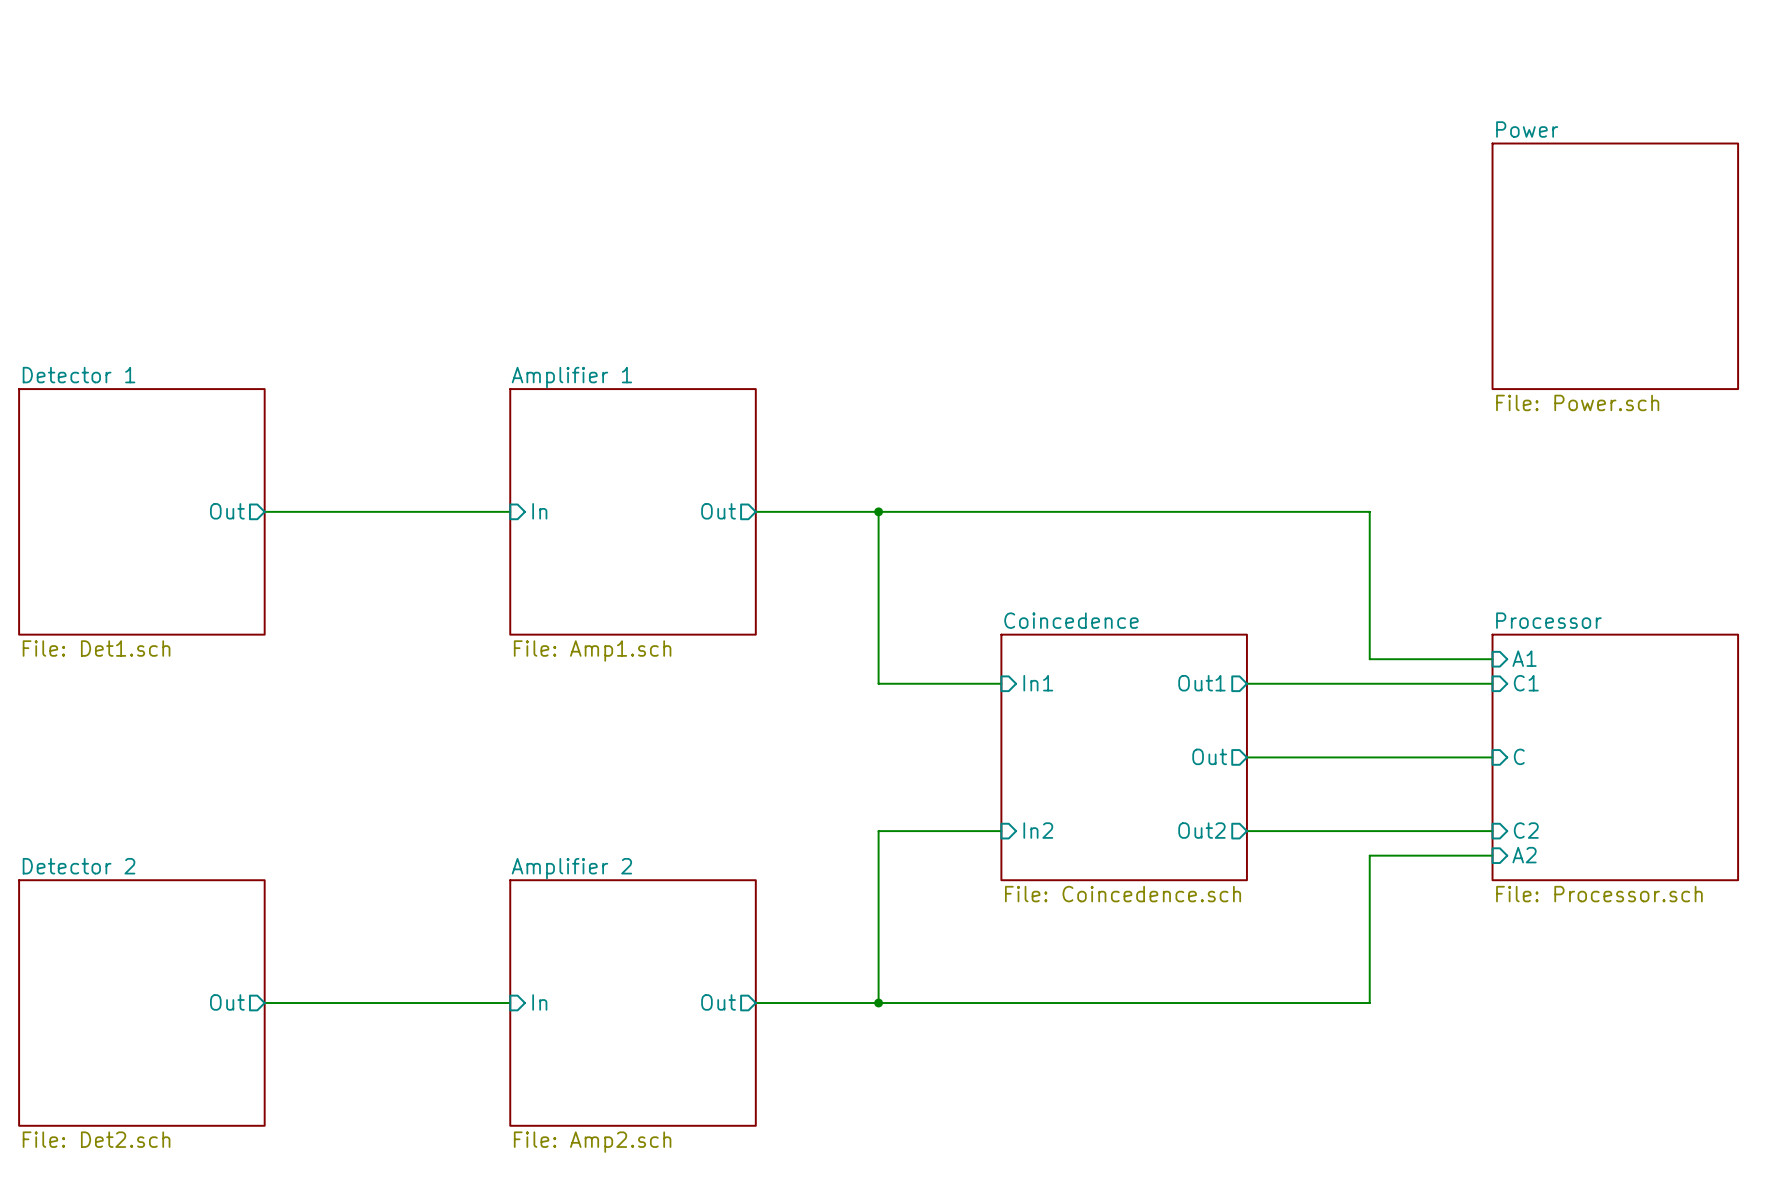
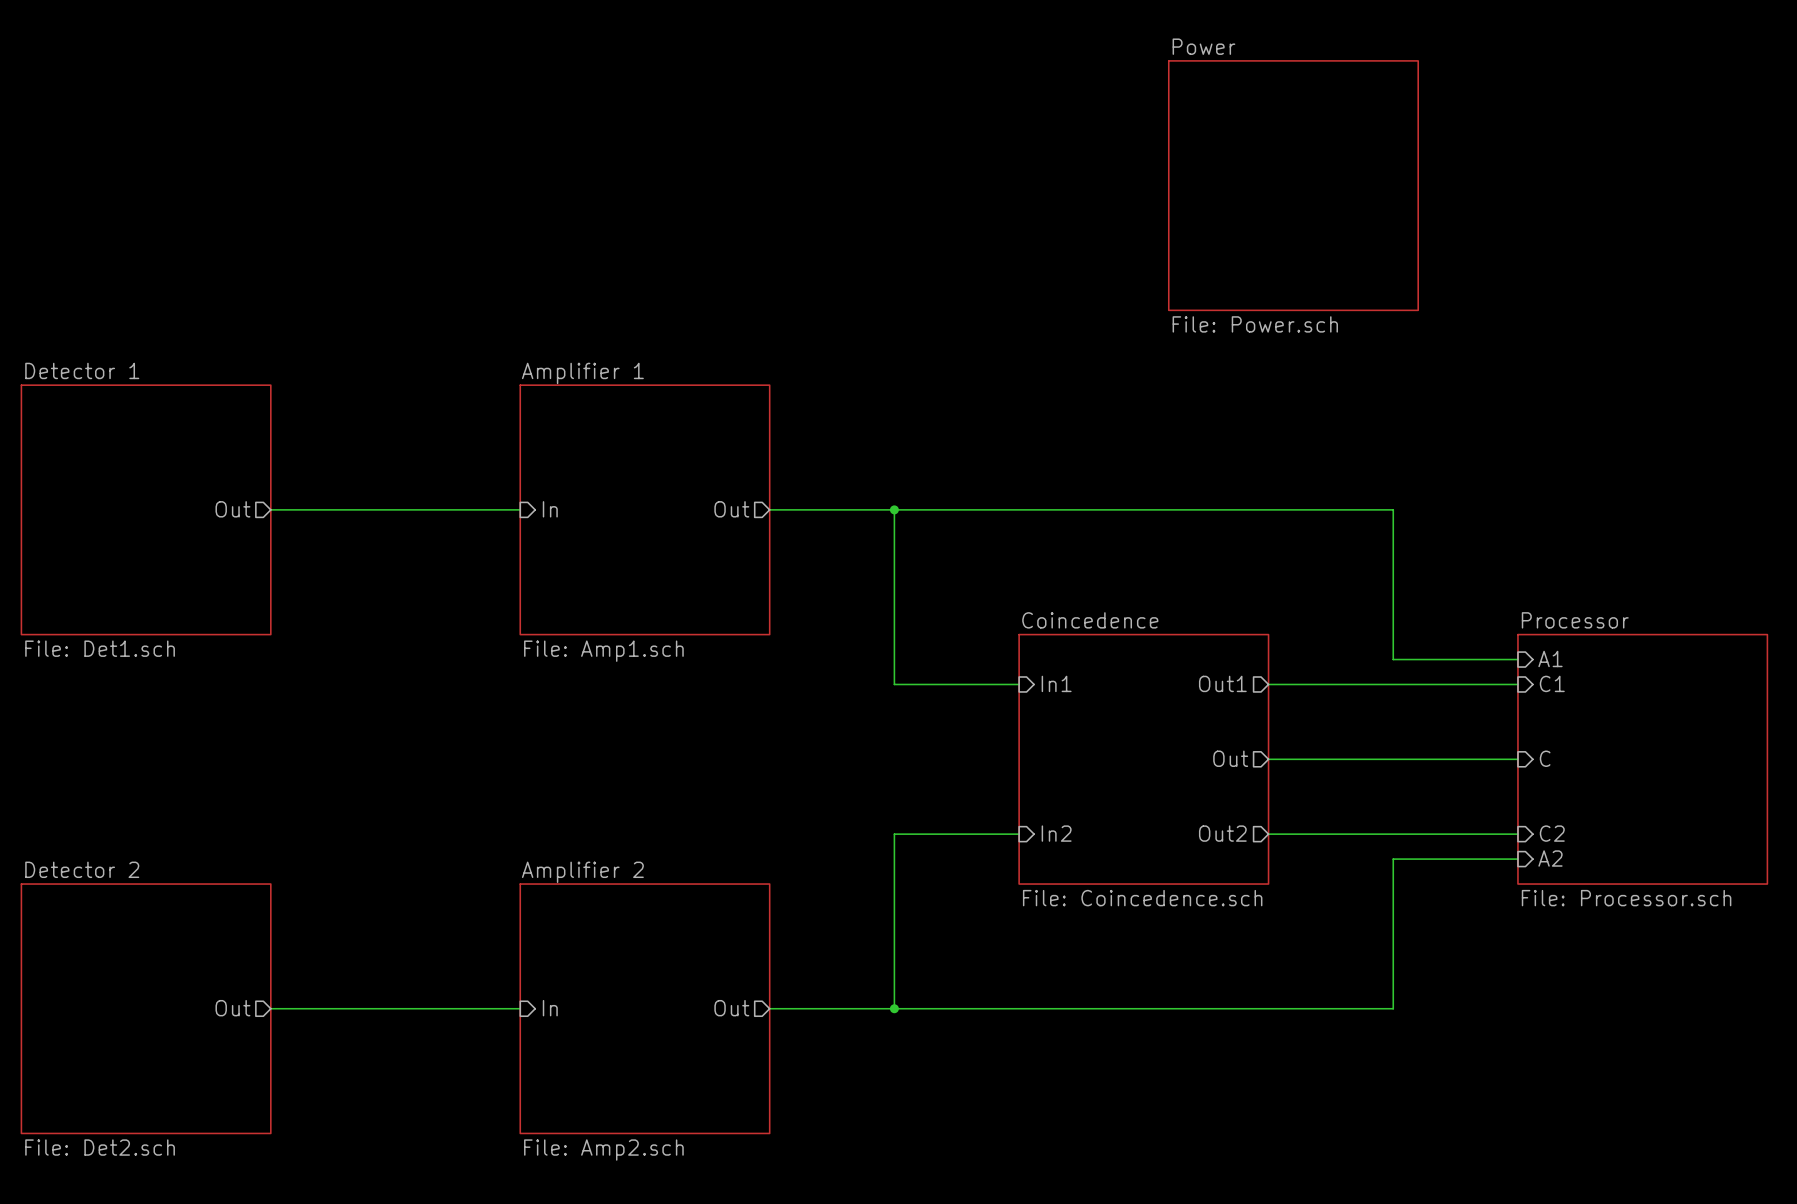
sheet Power: none -> File: Power.sch (1293, 185)
sheet Power: File: Power.sch (1615, 266) -> none

